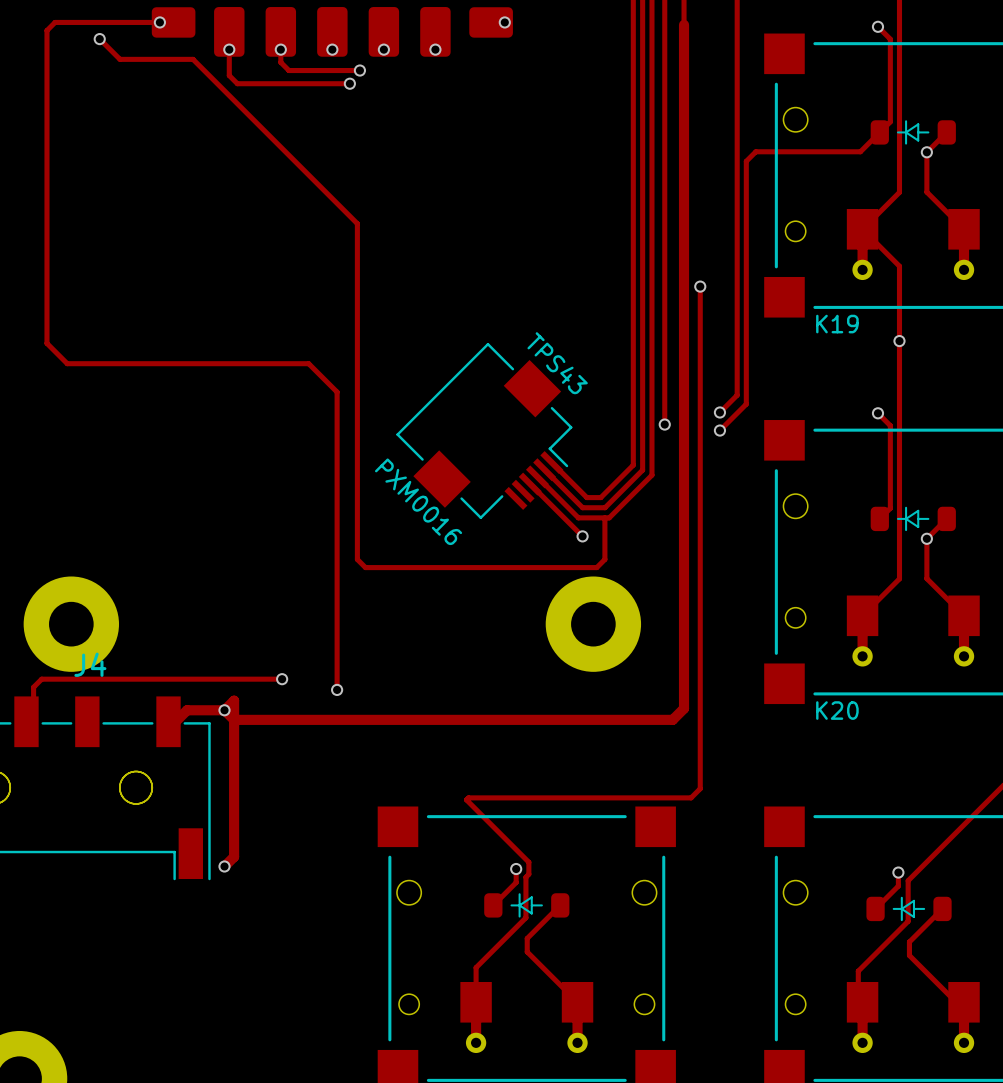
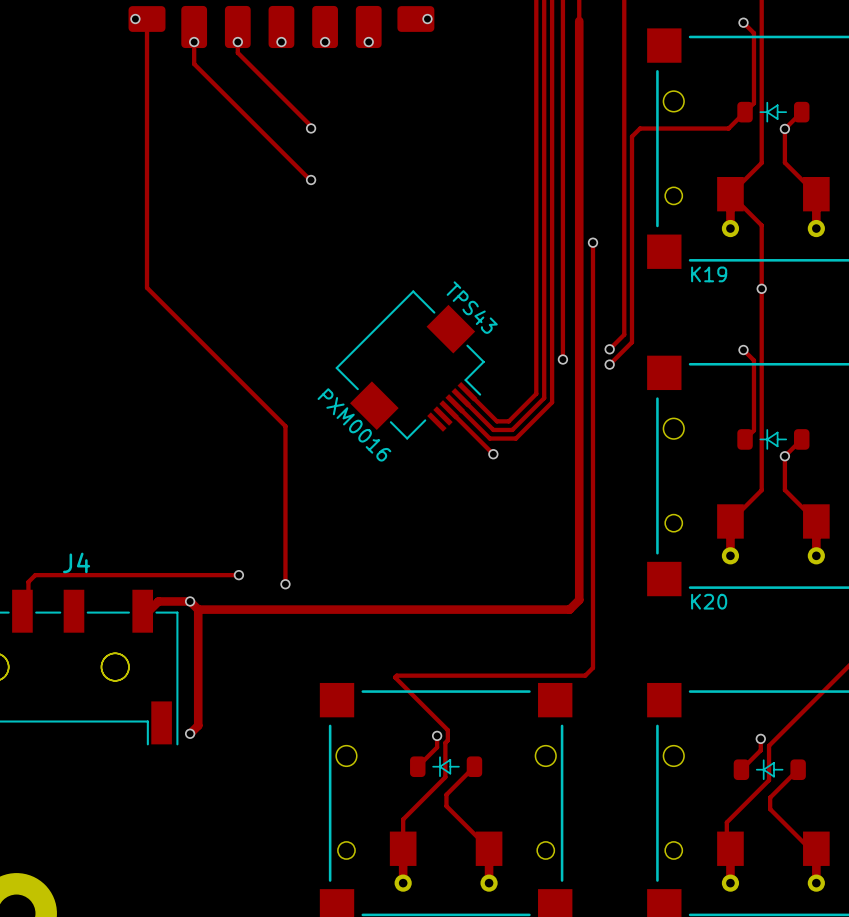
track: (173, 22) (55, 22) (46, 30) (46, 343) (67, 363) (308, 363) (337, 392) (337, 503) -> (147, 19) (147, 287) (285, 426)
track: (99, 39) (120, 59) (193, 59) (357, 223) (357, 559) (365, 567) (596, 567) (604, 559) (604, 517) -> none
via: (99, 39) -> none
track: (288, 70) (359, 70) -> (244, 59) (311, 126) (311, 128)
via: (359, 70) -> none
track: (237, 83) (349, 83) -> (201, 70) (311, 179)
via: (349, 83) -> none
via: none -> (311, 128)
via: none -> (311, 179)
part: (71, 624) -> none
part: (593, 624) -> none
track: (224, 710) (234, 700) (234, 719) -> none

